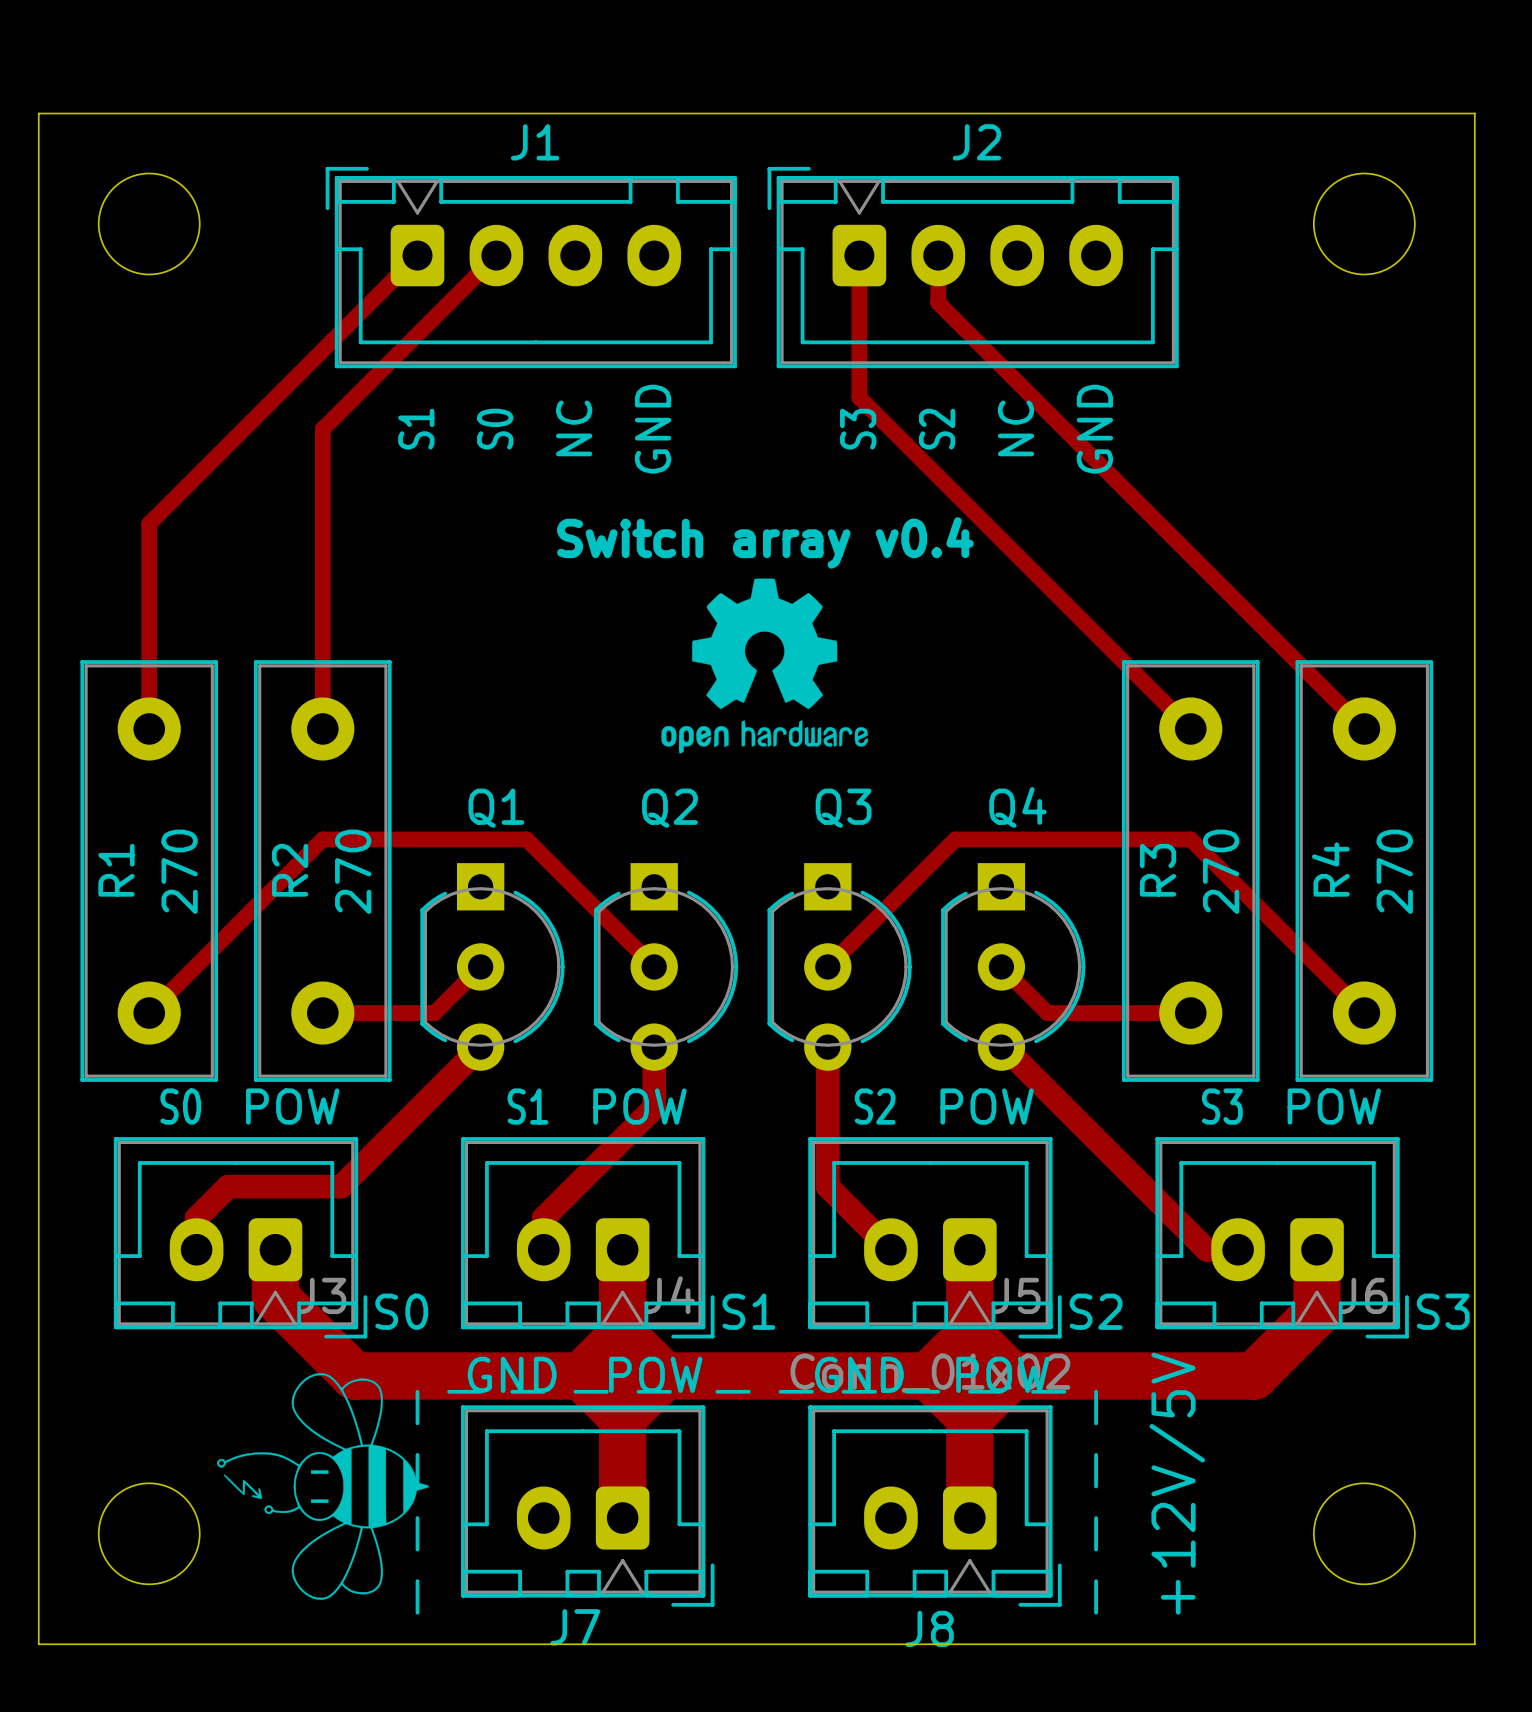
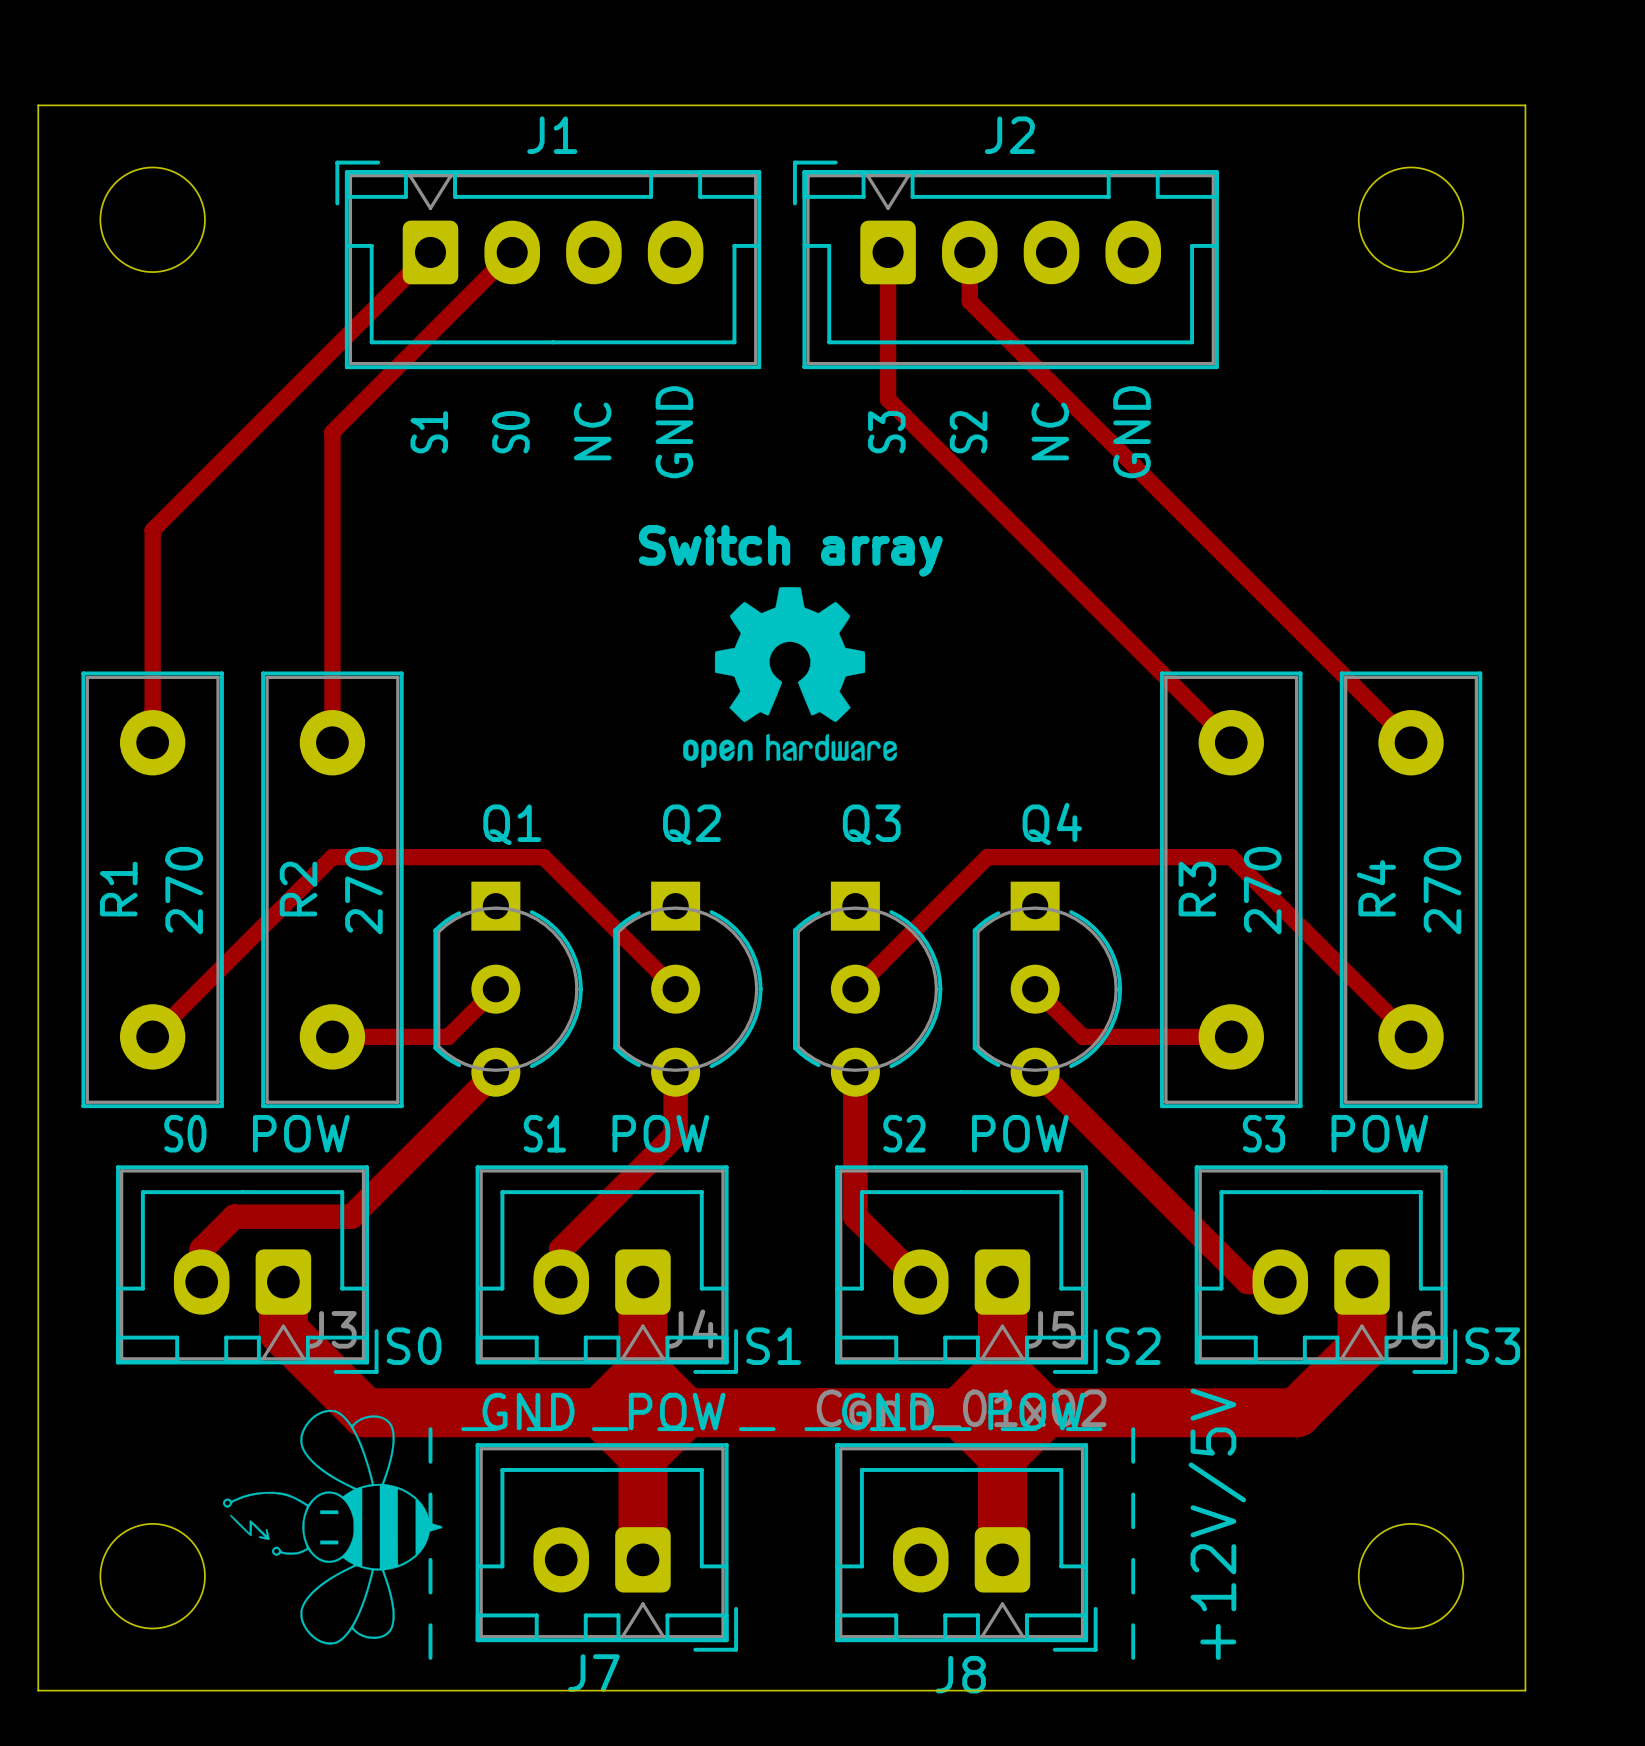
text: Switch array v0.4 (765, 542) -> Switch array (790, 550)

